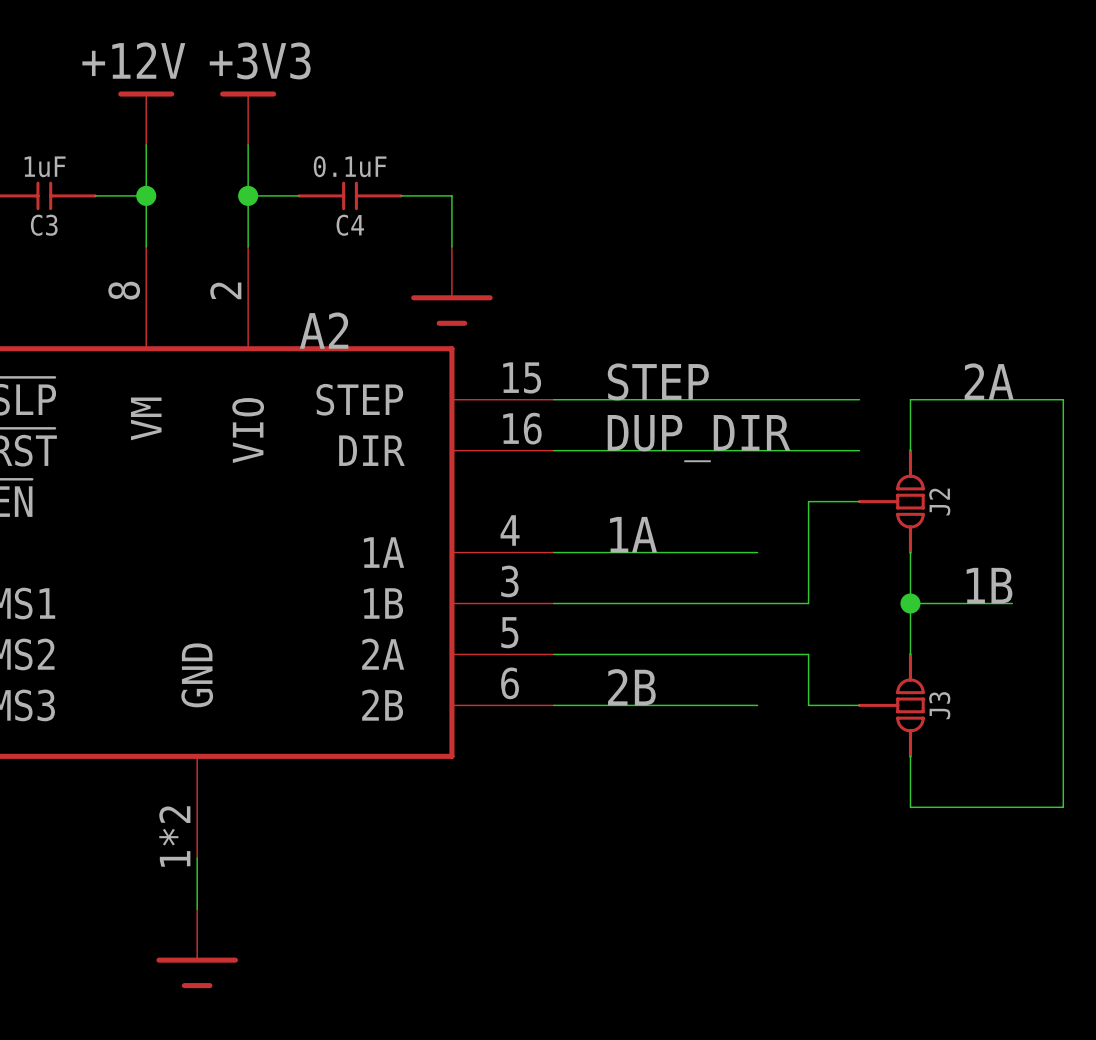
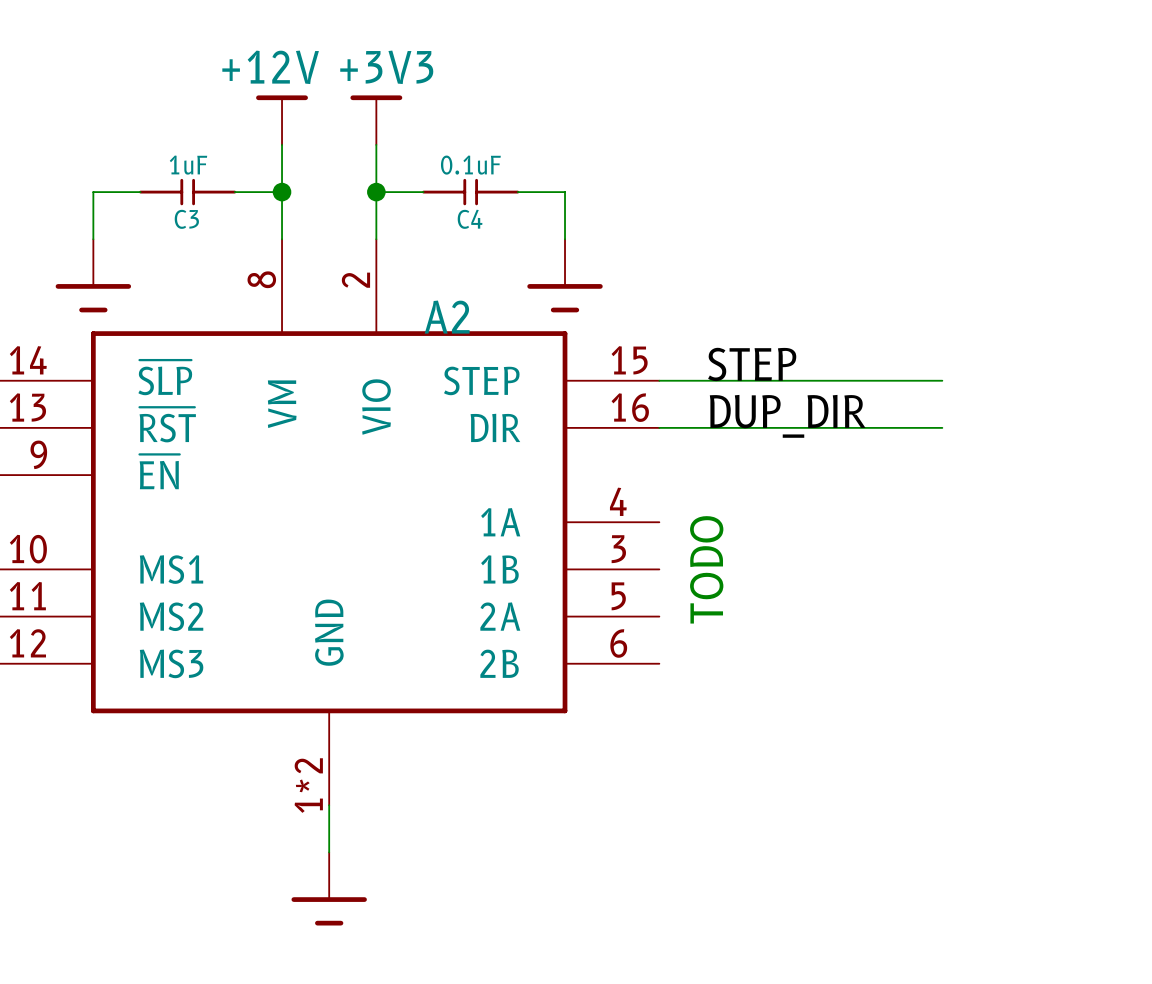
label: 2A (989, 381) -> none
wire: (910, 450) (910, 399) (1063, 399) (1063, 807) (910, 807) (910, 756) -> none
wire: (859, 501) (808, 501) (808, 603) (553, 603) -> none
J2: (891, 501) -> none
label: 1A (633, 534) -> none
wire: (553, 552) (757, 552) -> none
wire: (910, 552) (910, 654) -> none
label: 1B (989, 585) -> none
wire: (910, 603) (1012, 603) -> none
junction: (910, 603) -> none
text: none -> TODO (706, 569)
wire: (553, 654) (808, 654) (808, 705) (859, 705) -> none
label: 2B (631, 687) -> none
wire: (553, 705) (757, 705) -> none
J3: (891, 705) -> none

